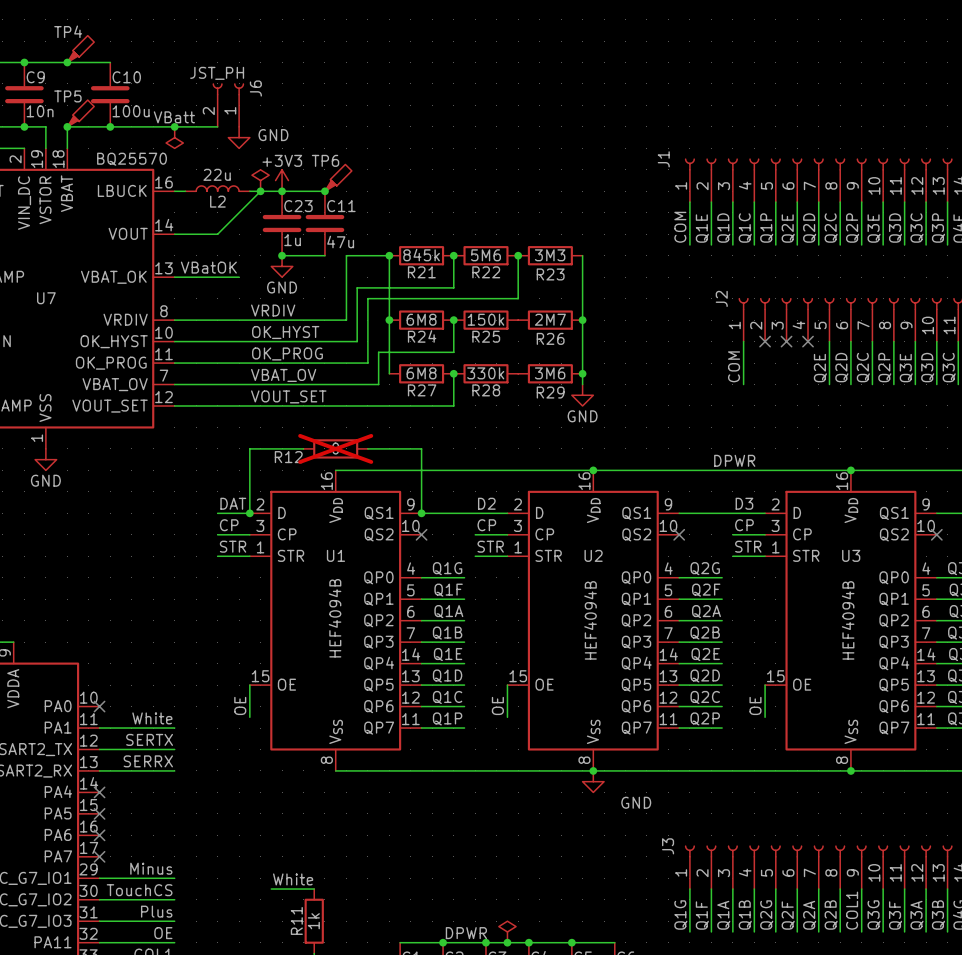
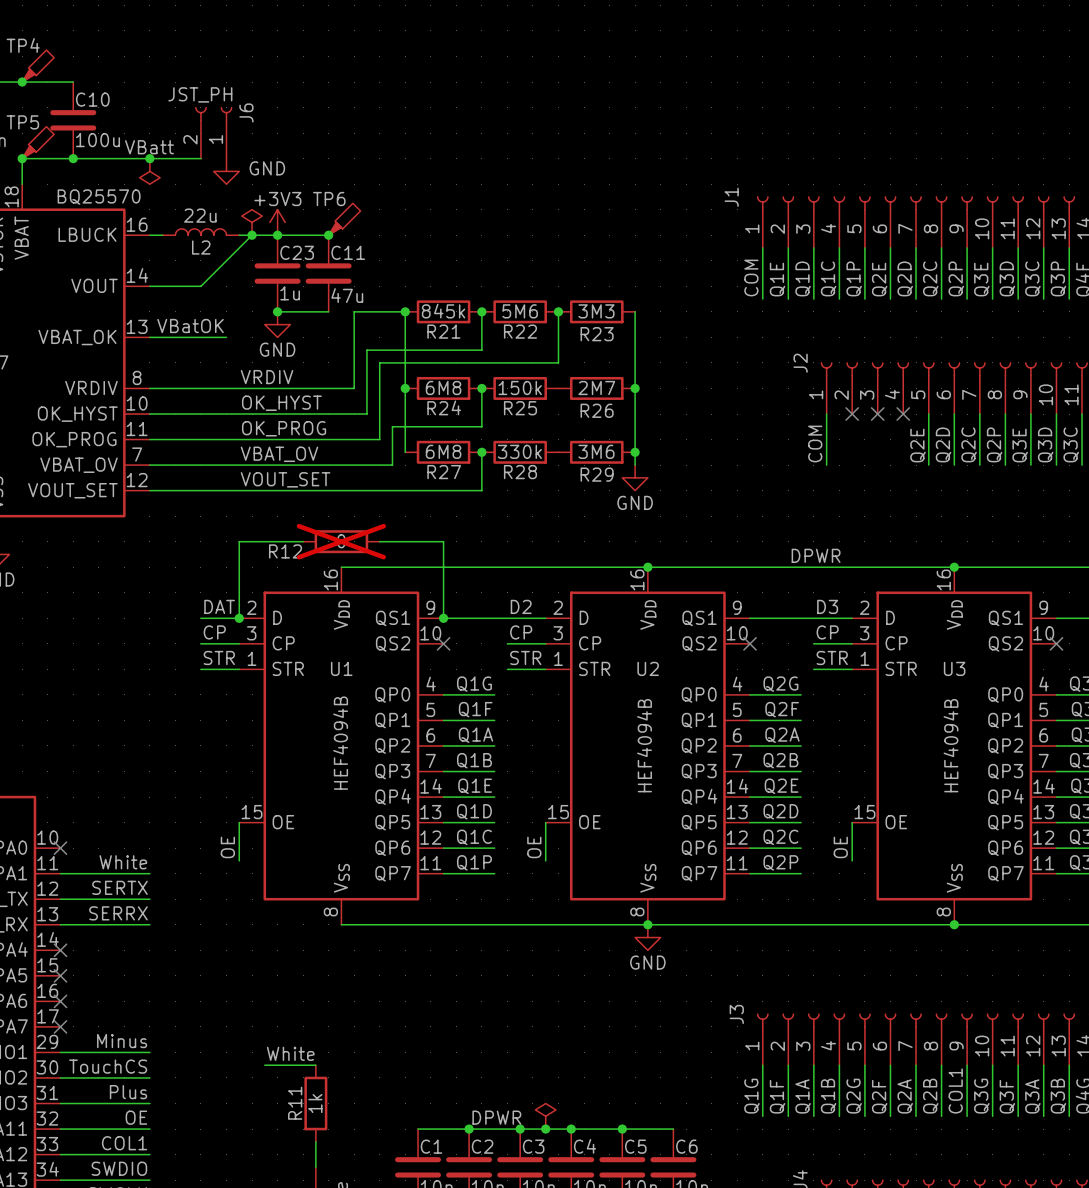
power symbol text position: GND (636, 802) -> GND (647, 962)

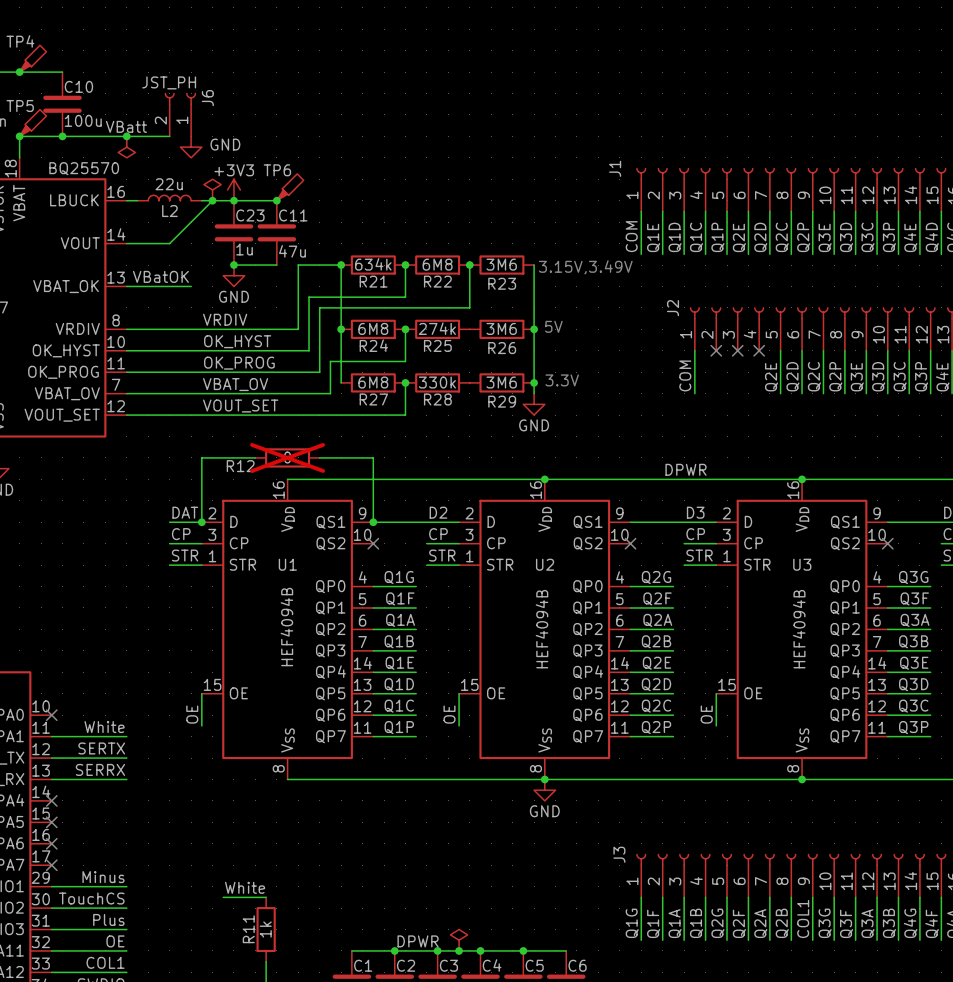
R21 value: 845k (443, 311) -> 634k (373, 264)
R22 value: 5M6 (520, 311) -> 6M8 (437, 264)
R23 value: 3M3 (596, 311) -> 3M6 (501, 264)
text: none -> 3.15V,3.49V (585, 267)
text: none -> 5V (553, 326)
R25 value: 150k (520, 387) -> 274k (437, 328)
R26 value: 2M7 (596, 387) -> 3M6 (501, 328)
text: none -> 3.3V (562, 380)

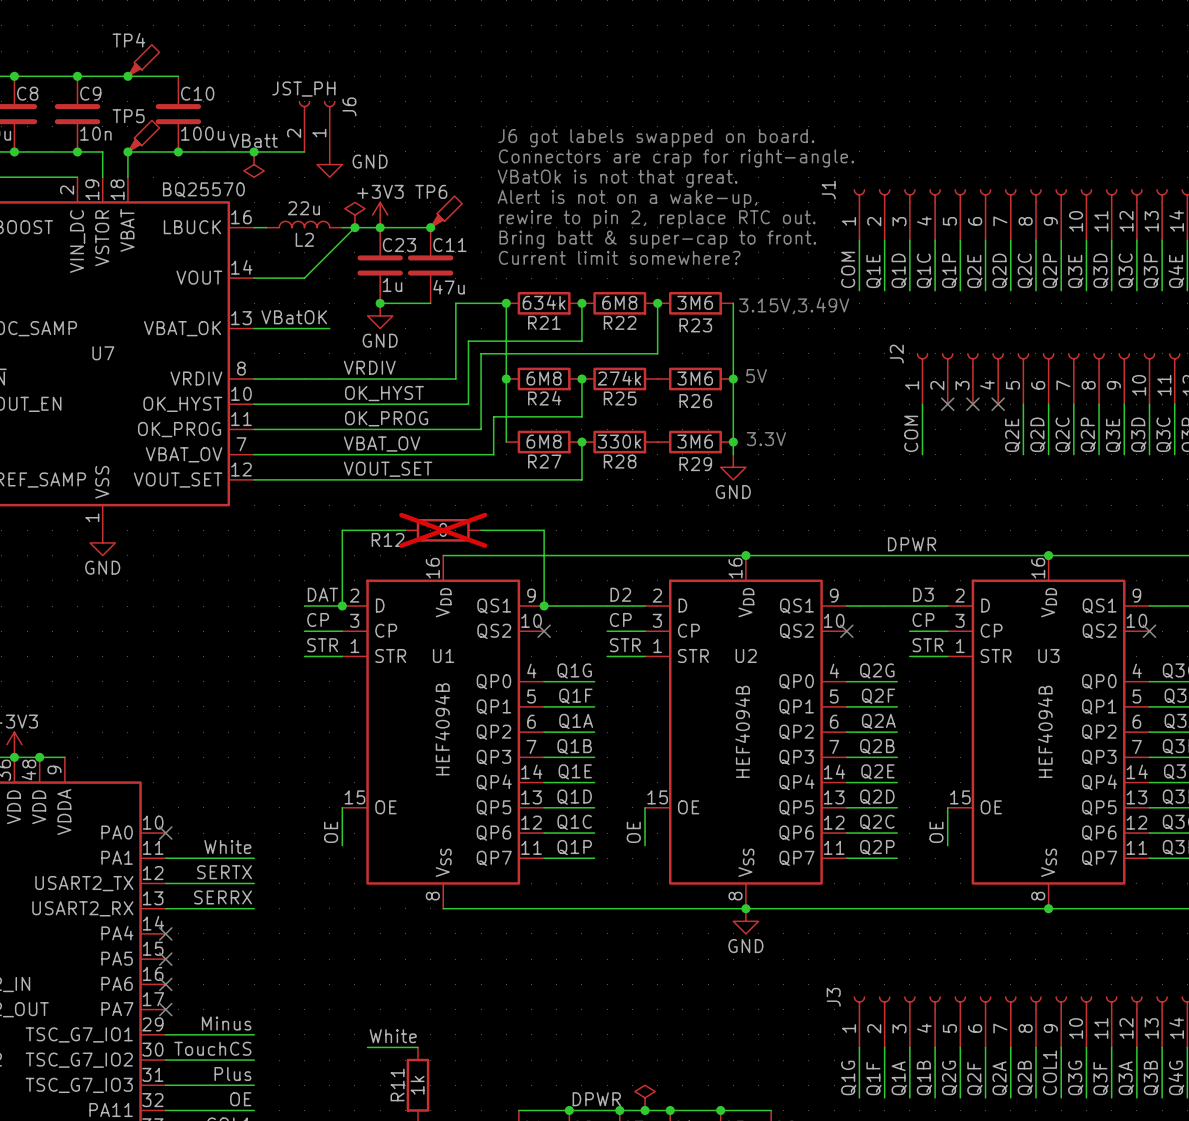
text: none -> J6 got labels swapped on board. (656, 138)
text: none -> Connectors are crap for right-angle. (676, 158)
text: none -> VBatOk is not that great. (617, 178)
text: none -> Alert is not on a wake-up, (627, 199)
text: none -> rewire to pin 2, replace RTC out. (657, 219)
text: none -> Bring batt & super-cap to front. (657, 239)
text: none -> Current limit somewhere? (619, 257)

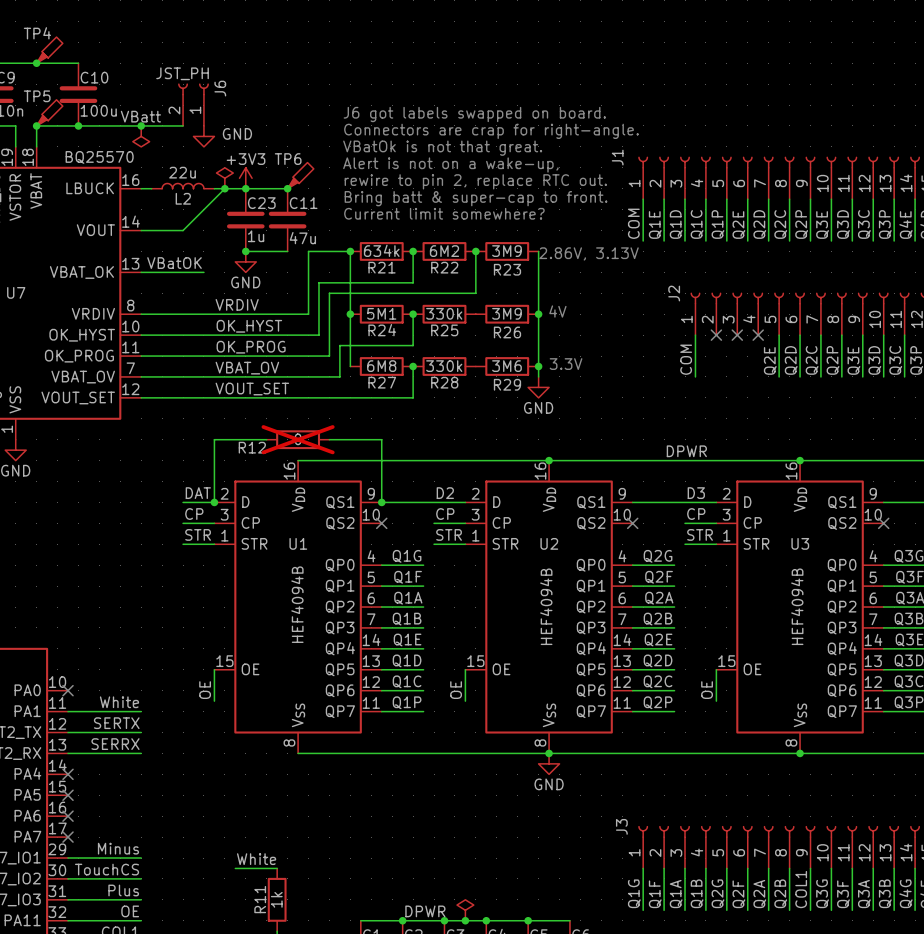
R22 value: 6M8 (619, 302) -> 6M2 (444, 251)
R23 value: 3M6 (695, 302) -> 3M9 (506, 251)
text: 3.15V,3.49V (794, 306) -> 2.86V, 3.13V (589, 253)
text: 5V (756, 376) -> 4V (557, 311)
R24 value: 6M8 (544, 378) -> 5M1 (381, 313)
R25 value: 274k (619, 378) -> 330k (444, 313)
R26 value: 3M6 (695, 378) -> 3M9 (506, 313)

